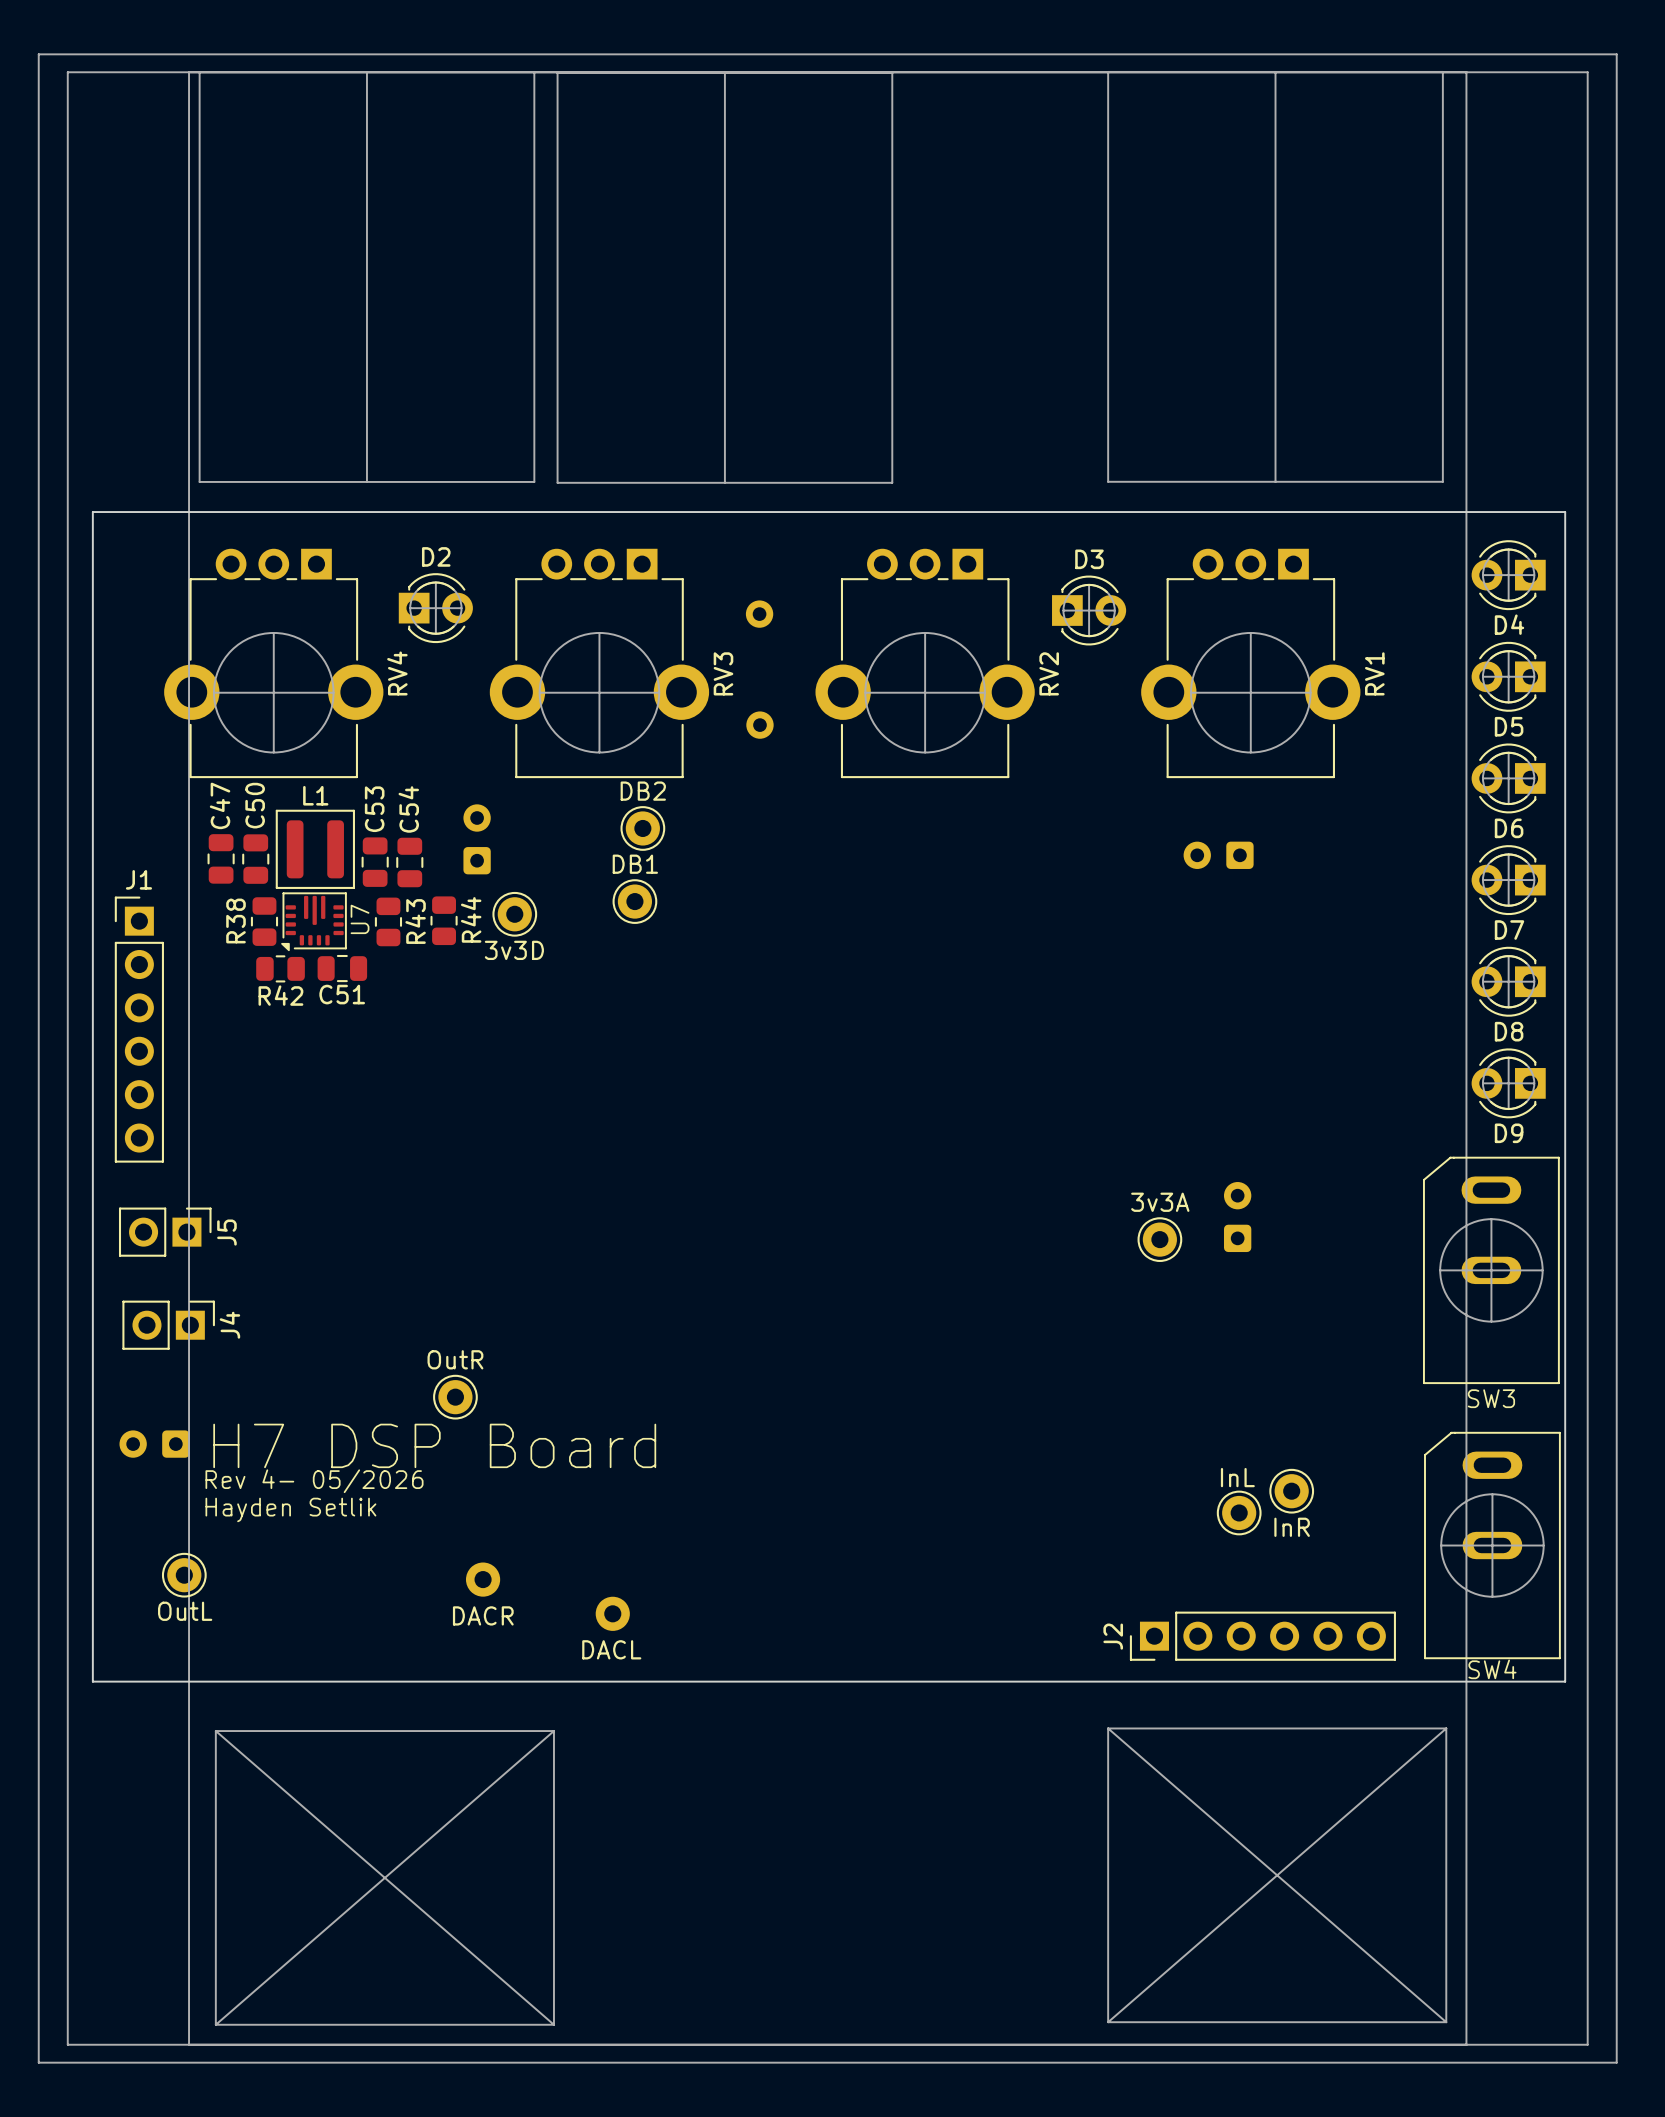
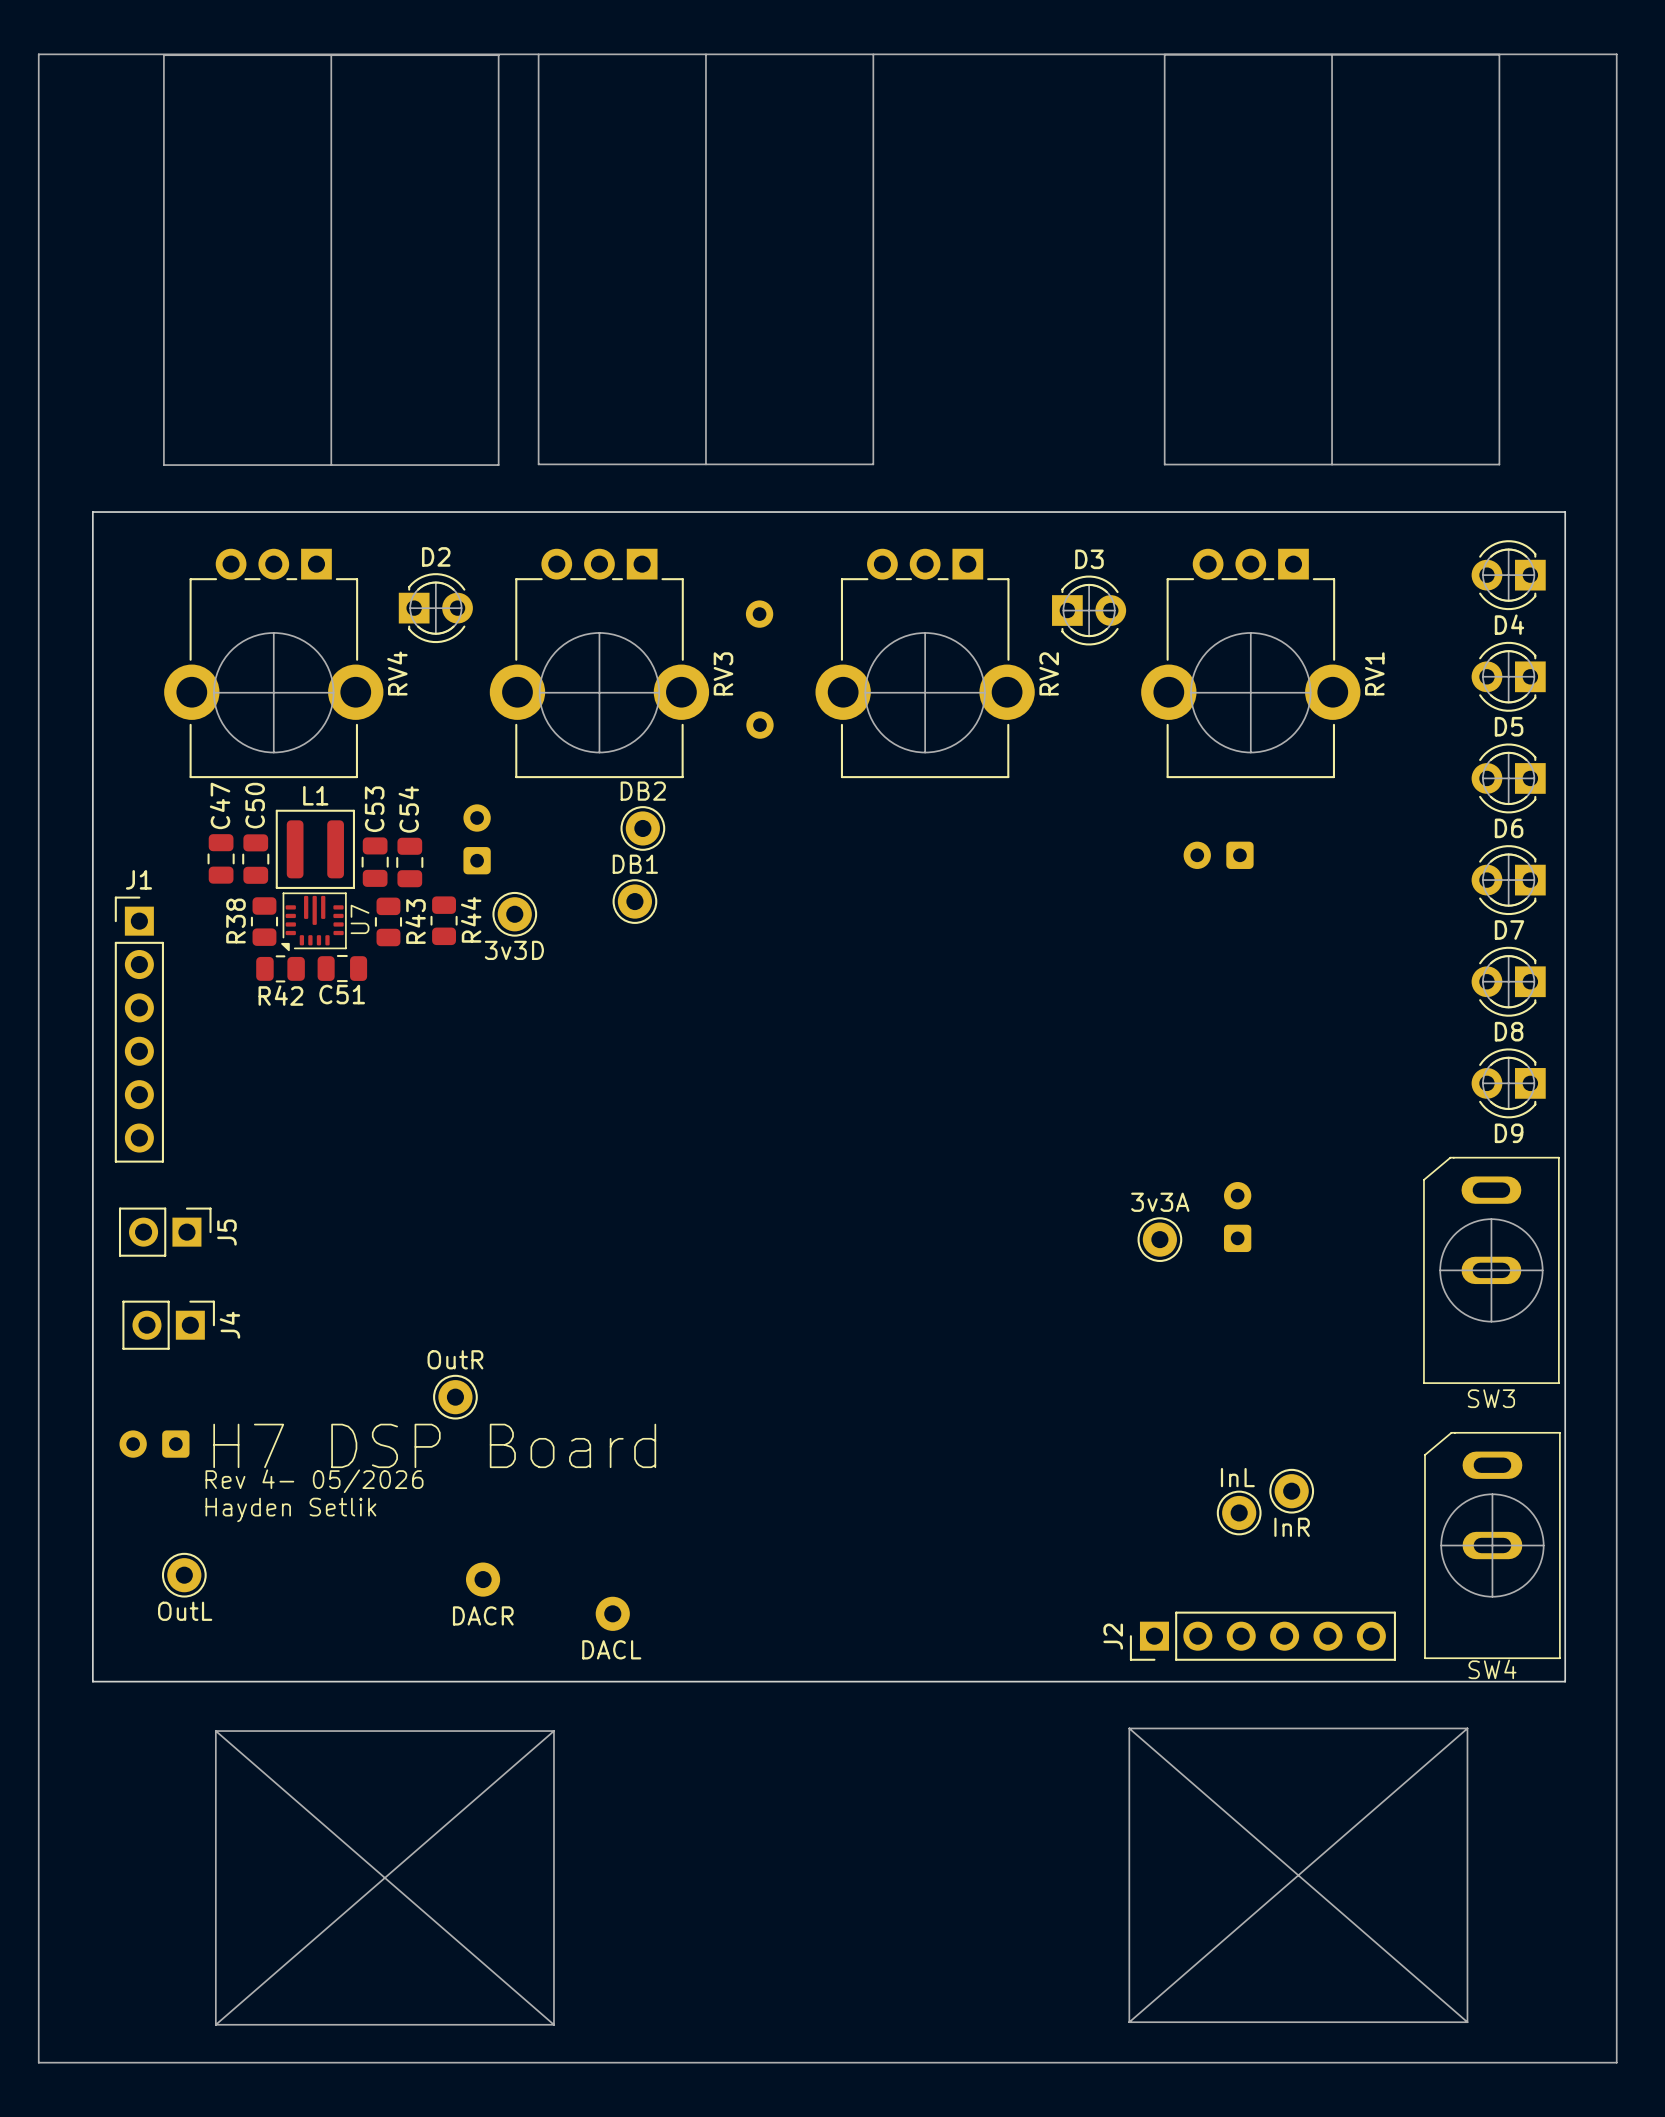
line: none -> (538, 54) (538, 464) (873, 464) (873, 54)
line: (1108, 71) (1442, 71) (1442, 481) (1108, 481) (1108, 71) -> (1164, 54) (1499, 54) (1499, 464) (1164, 464) (1164, 54)
line: (1275, 71) (1275, 481) -> (1332, 54) (1332, 464)
line: (67, 72) (1587, 72) (1587, 2044) (67, 2044) (67, 72) -> none
line: (189, 72) (189, 2044) -> none
line: (199, 72) (534, 72) (534, 481) (199, 481) (199, 72) -> (163, 55) (498, 55) (498, 465) (163, 465) (163, 55)
line: (366, 72) (366, 481) -> (331, 55) (331, 465)
line: (557, 72) (892, 72) (892, 482) (557, 482) (557, 72) -> none
line: (724, 72) (724, 482) -> (705, 54) (705, 464)
line: (1466, 72) (1466, 2044) -> none
line: (1108, 1728) (1129, 1728) -> (1446, 1728) (1467, 1728)
line: (1108, 1728) (1108, 2022) -> (1467, 1728) (1467, 2022)
line: (1108, 1728) (1446, 2022) (1446, 1728) (1108, 2022) -> none
line: none -> (1467, 1728) (1129, 2022) (1129, 1728) (1467, 2022)
line: (1108, 2022) (1129, 2022) -> (1446, 2022) (1467, 2022)

